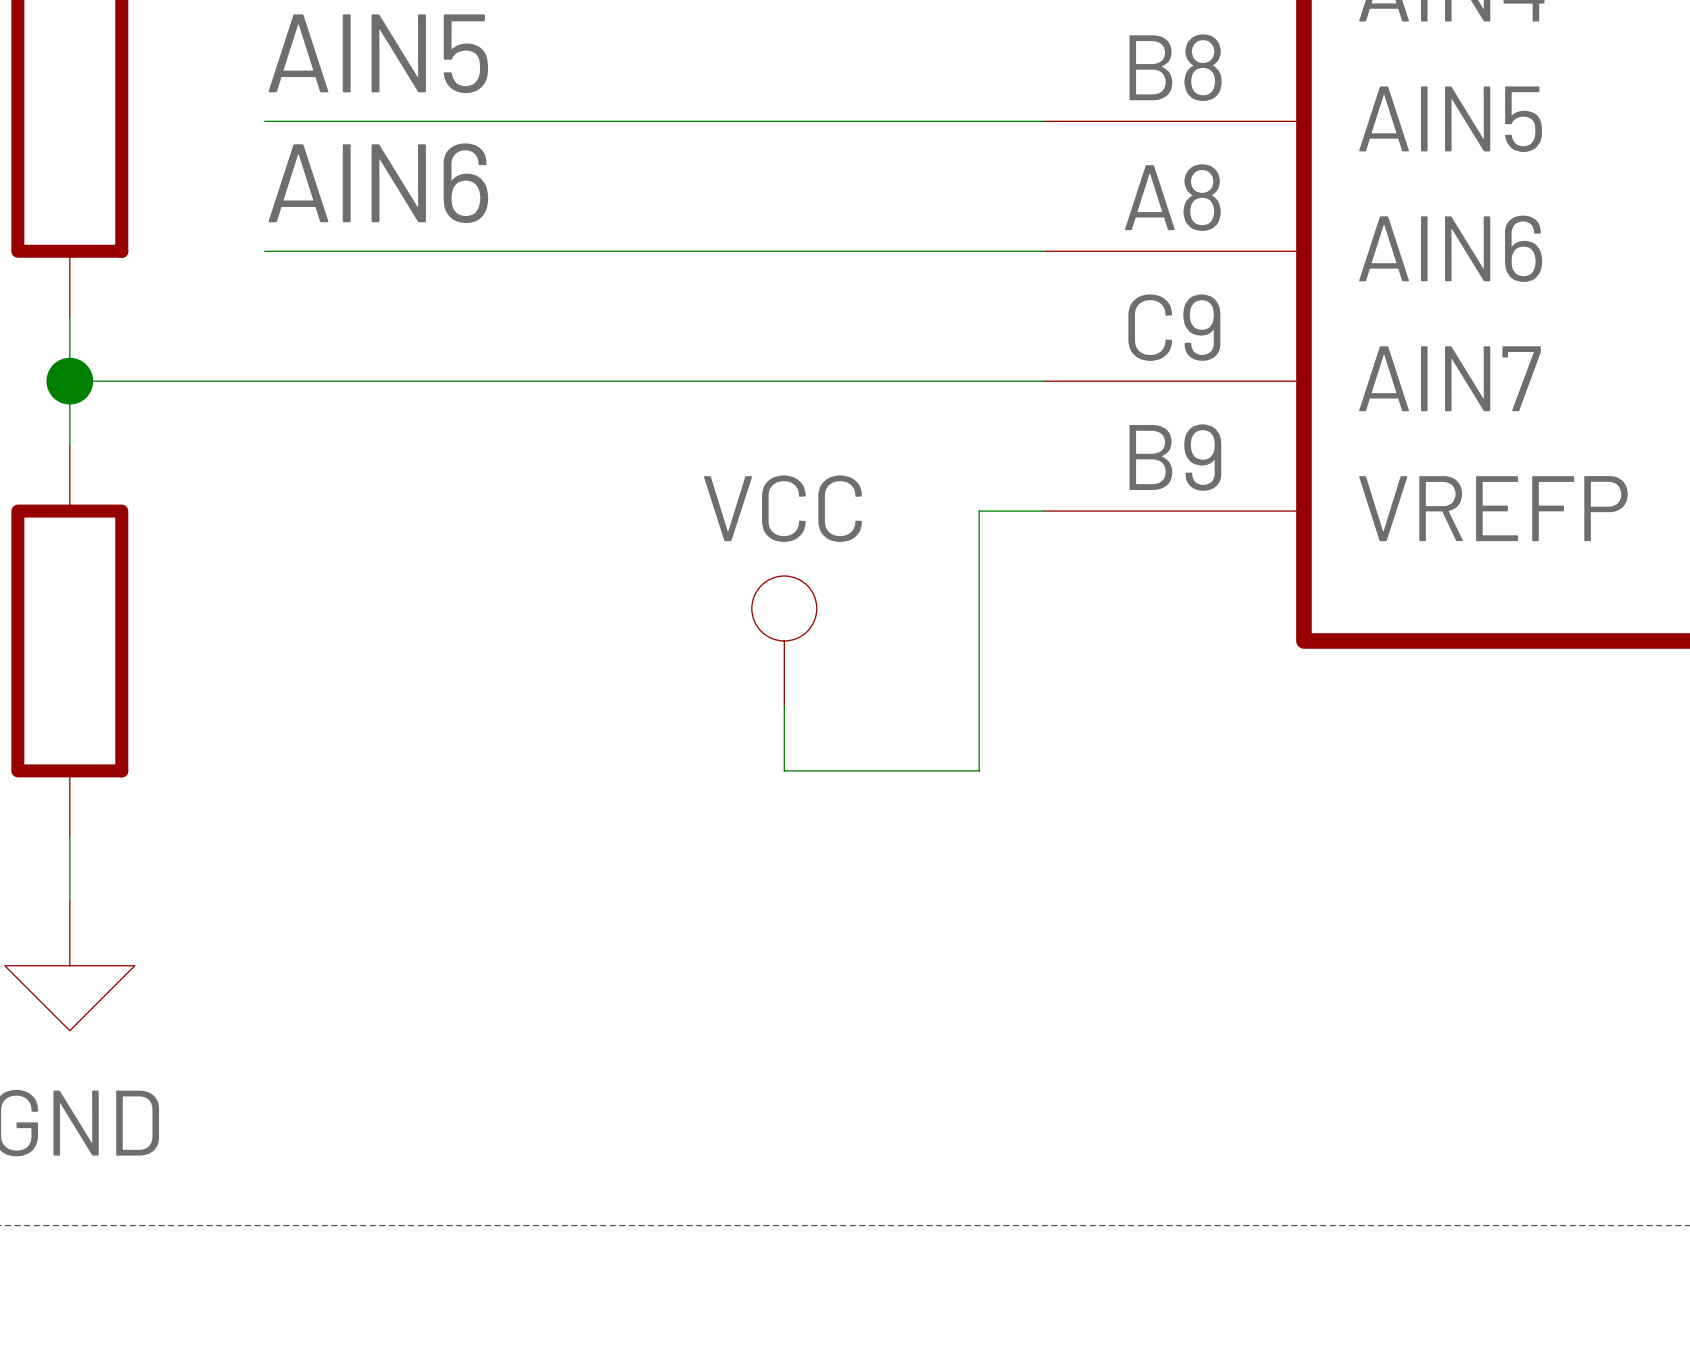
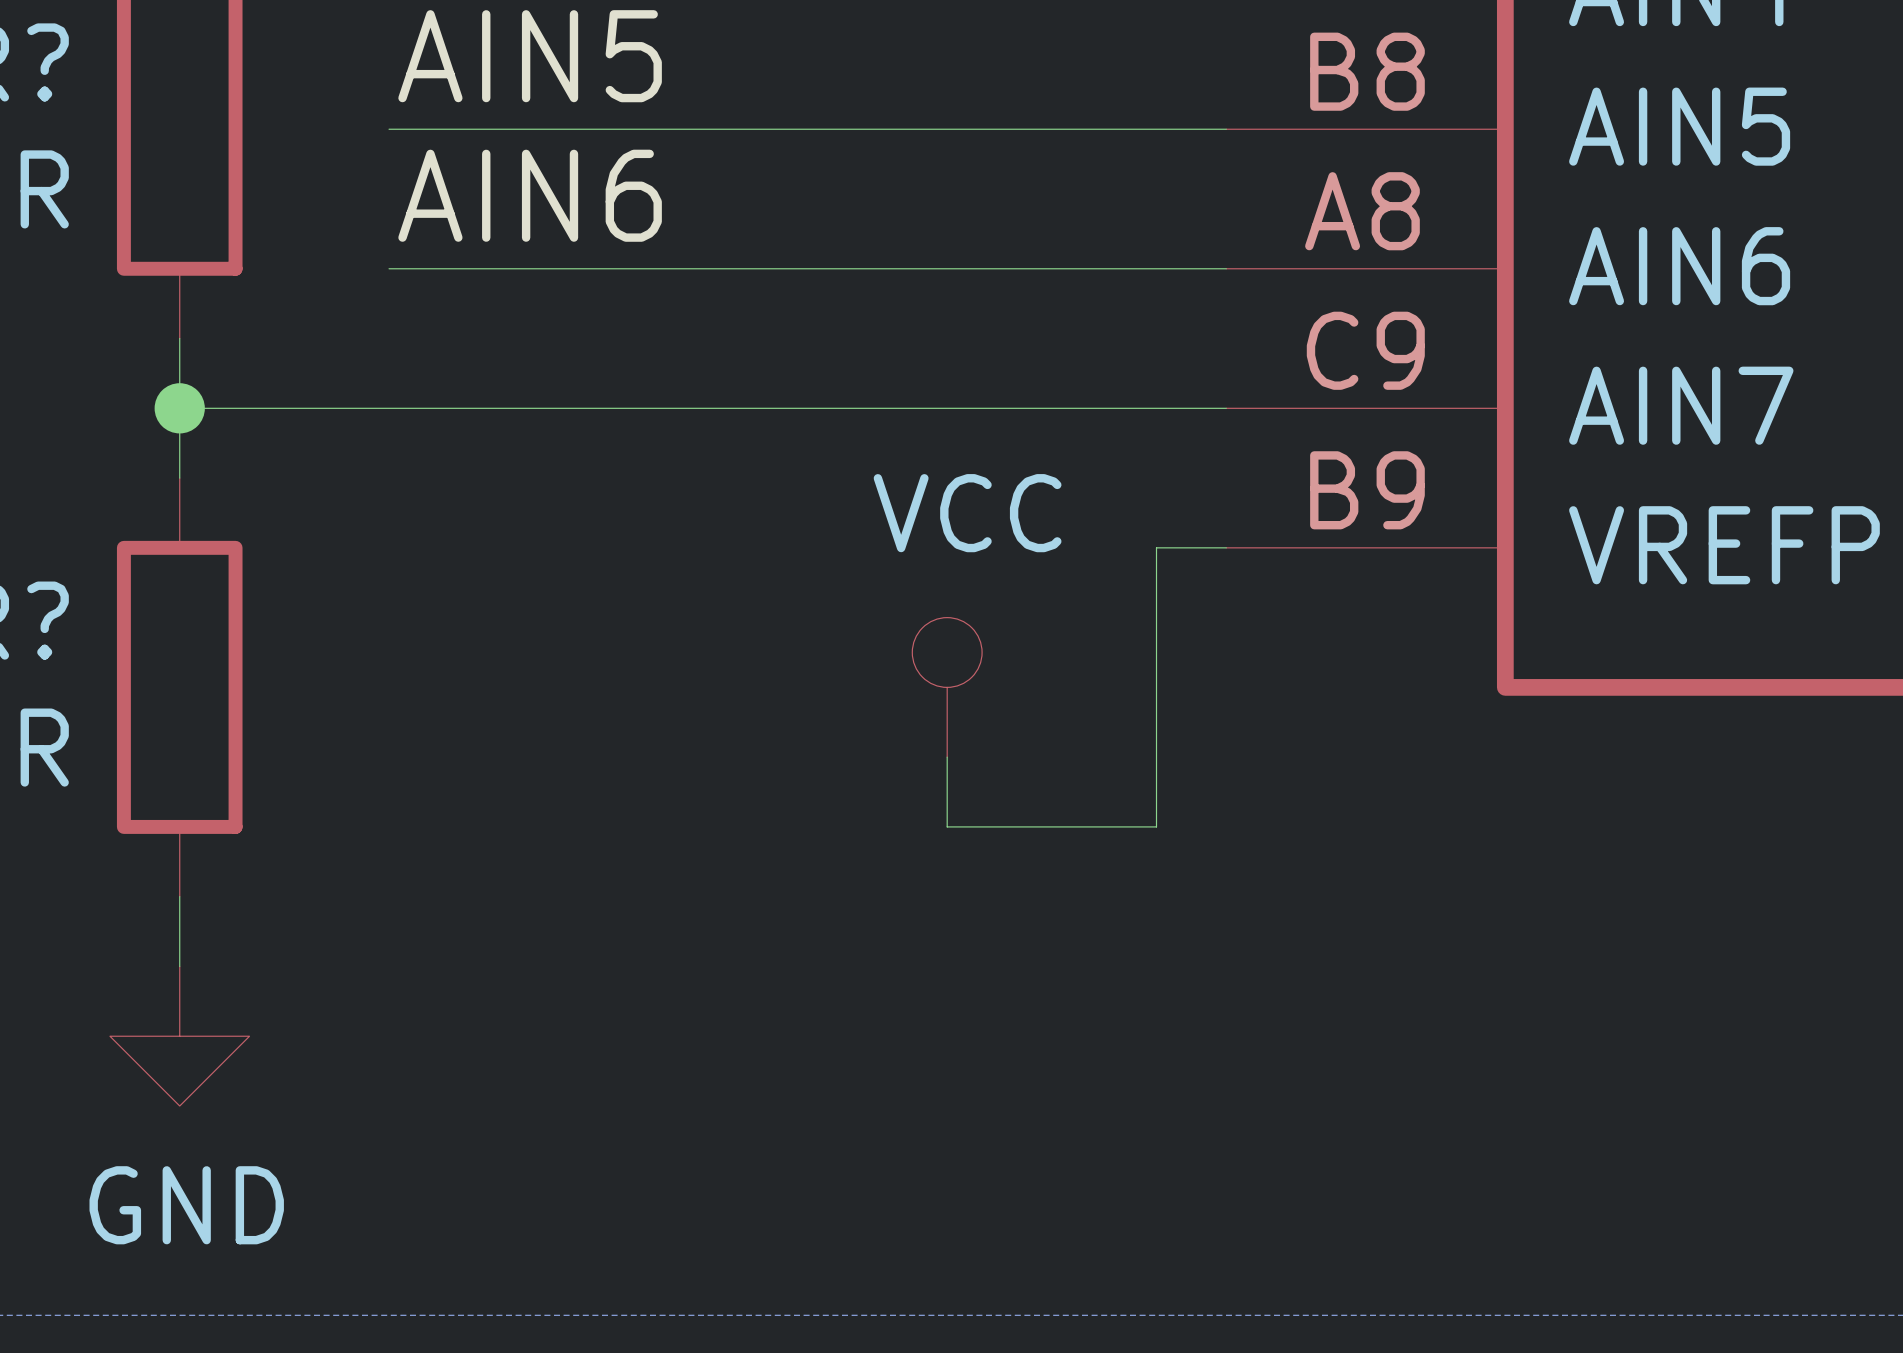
power symbol text position: VCC (782, 508) -> VCC (967, 513)

